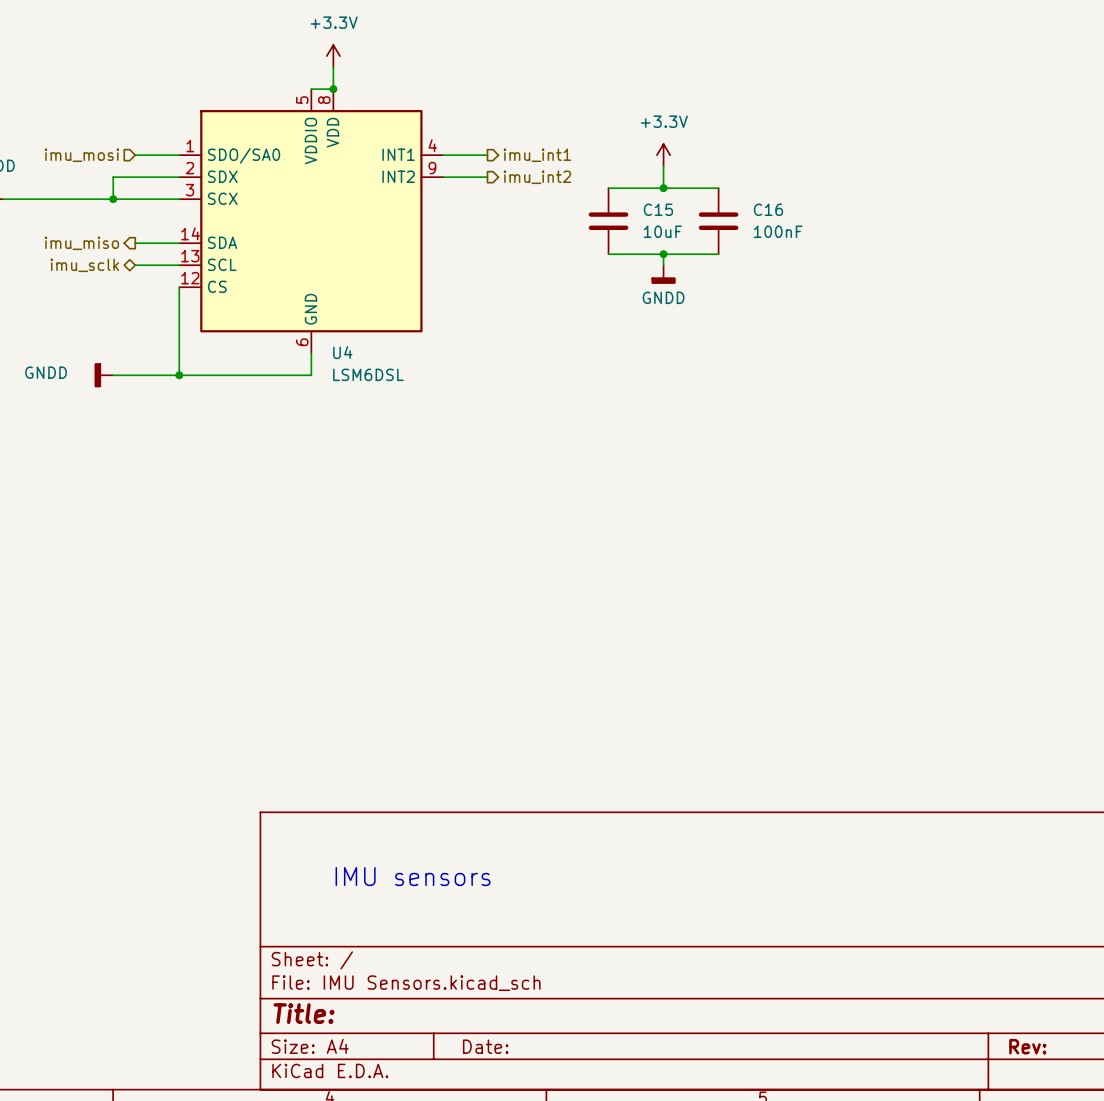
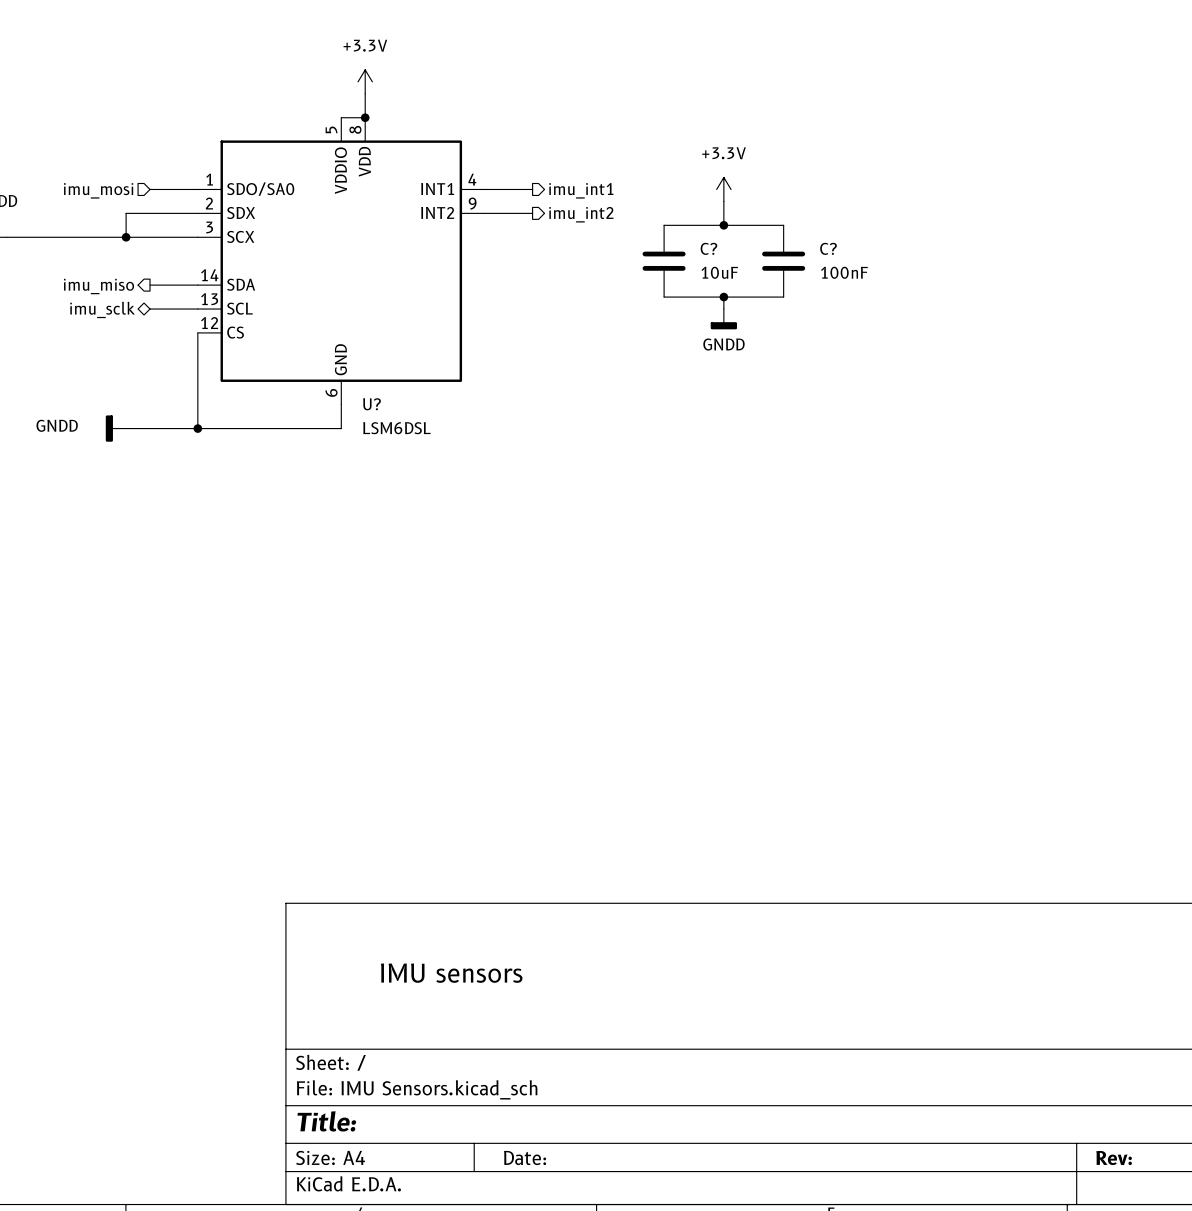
C15 name: C15 (658, 209) -> C? (708, 248)
C16 name: C16 (768, 209) -> C? (828, 248)
U4 name: U4 (342, 352) -> U? (371, 404)

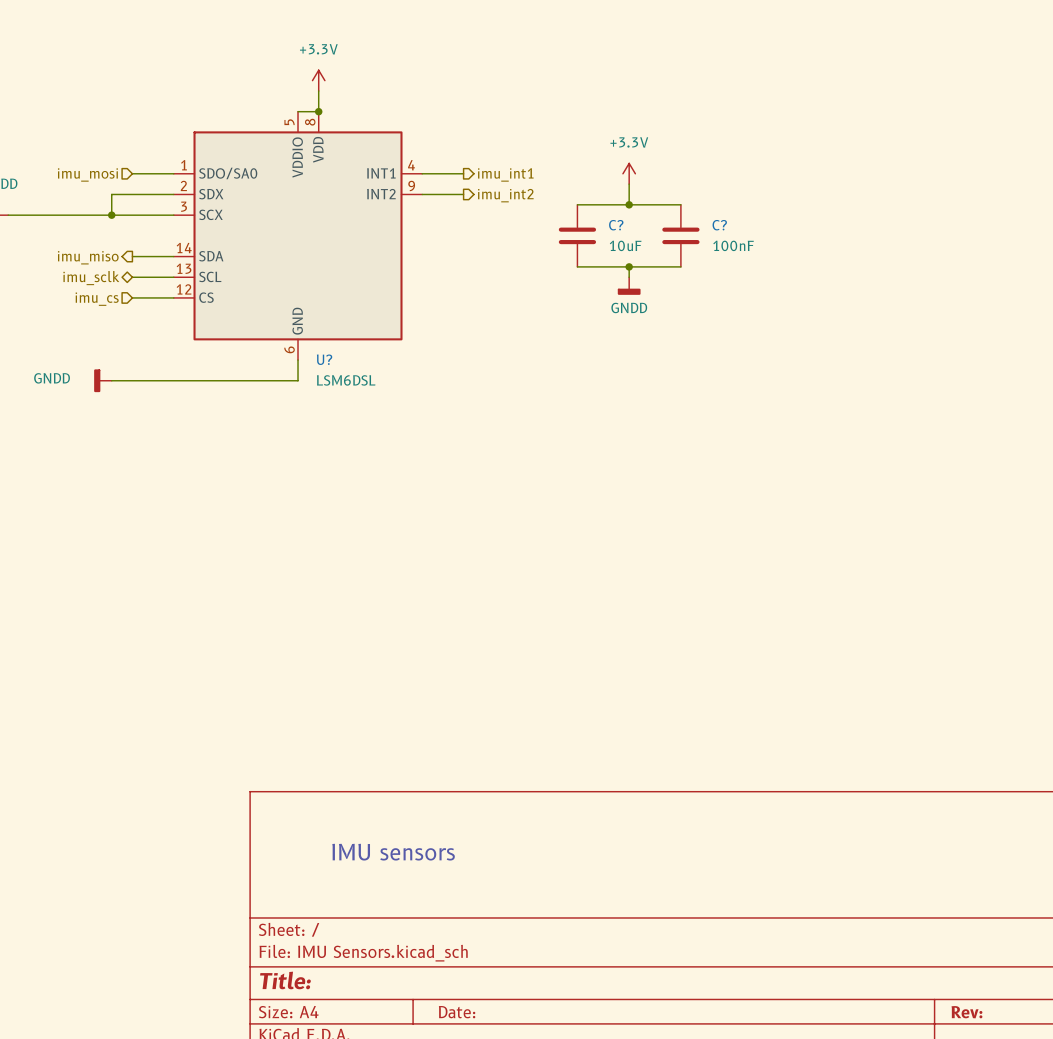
wire: (197, 332) (197, 428) -> (173, 297) (132, 297)
hierarchical label: none -> imu_cs (97, 299)
junction: (197, 428) -> none

